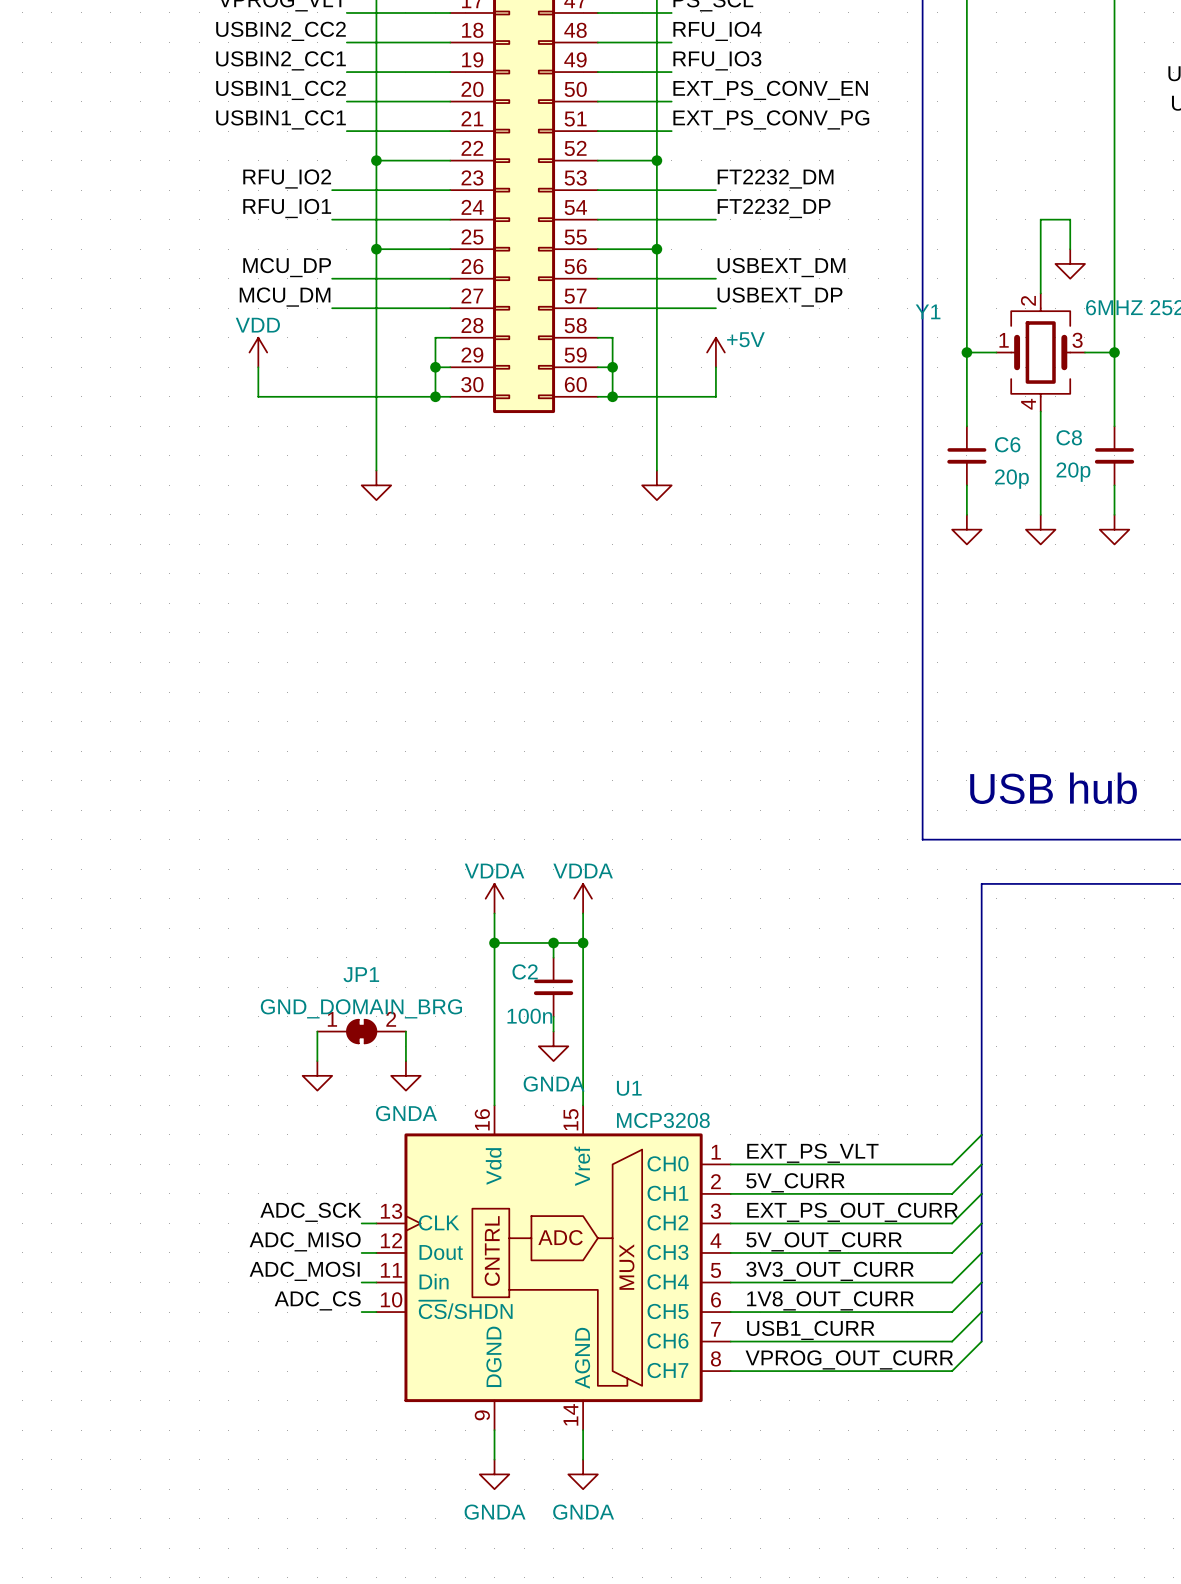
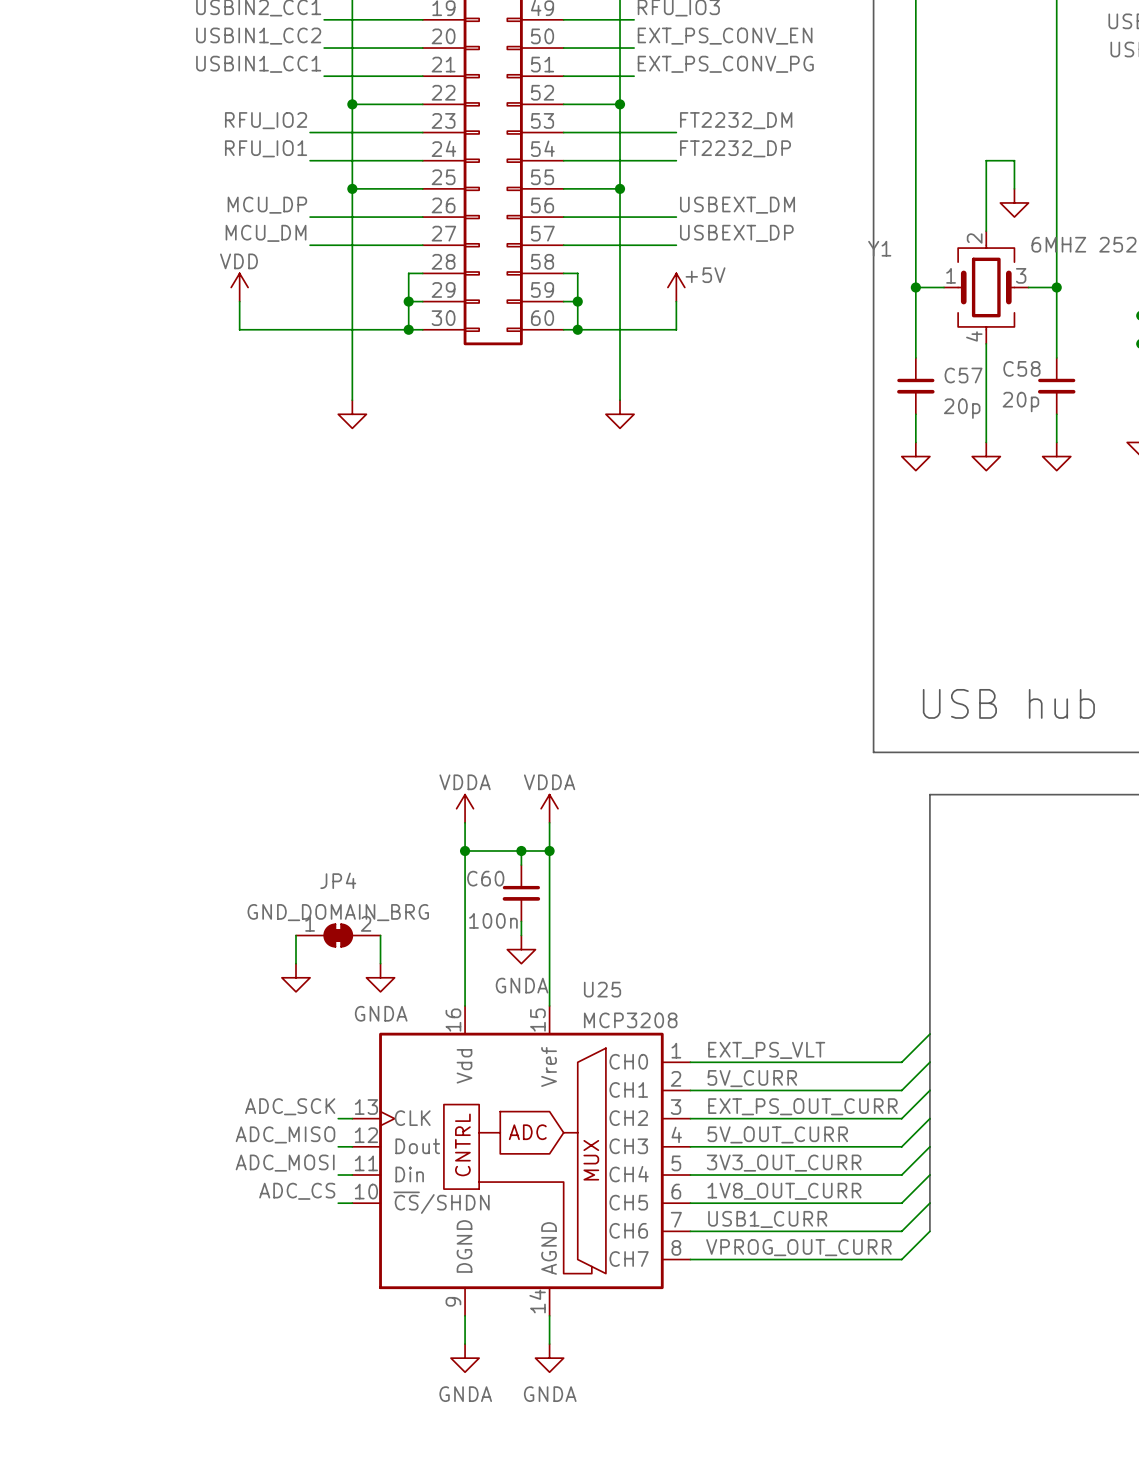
C8 name: C8 (1069, 437) -> C58 (1021, 368)
C6 name: C6 (1007, 444) -> C57 (963, 375)
C2 name: C2 (525, 971) -> C60 (485, 878)
JP1 name: JP1 (361, 974) -> JP4 (338, 880)
U1 name: U1 (629, 1088) -> U25 (602, 989)

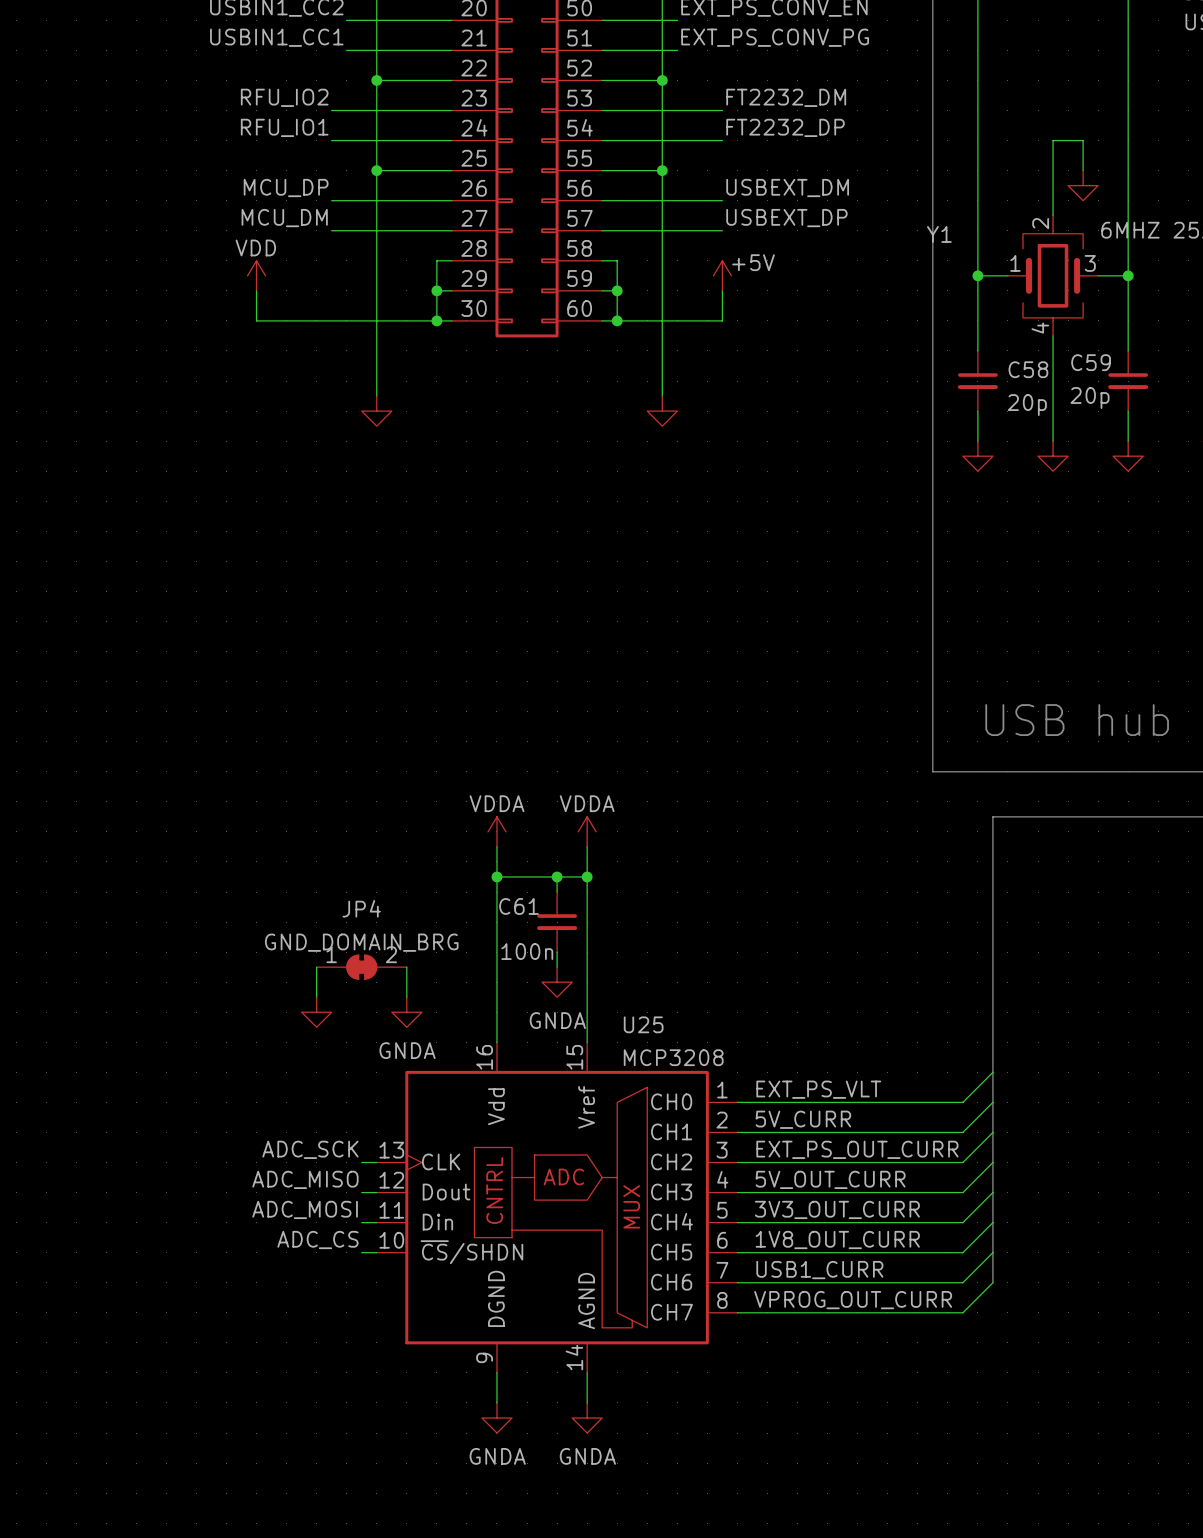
C58 name: C58 (1021, 368) -> C59 (1091, 362)
C57 name: C57 (963, 375) -> C58 (1028, 369)
C60 name: C60 (485, 878) -> C61 (519, 906)

